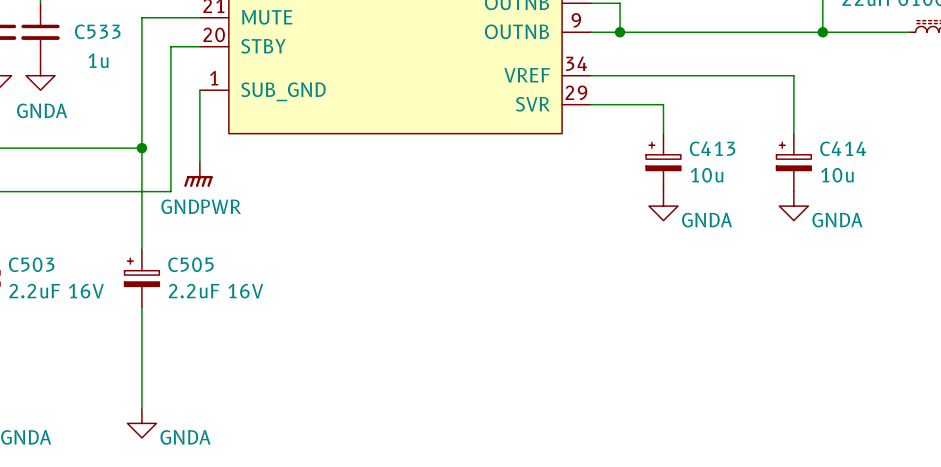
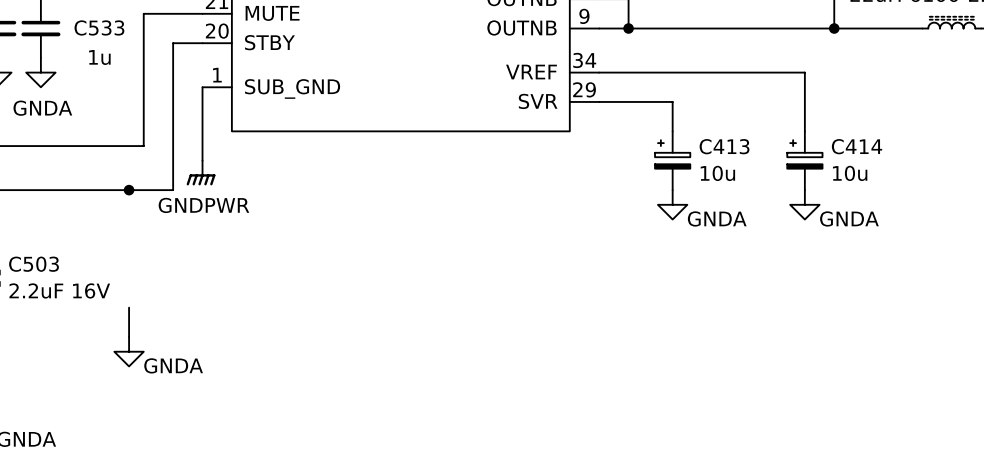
wire: (141, 148) (141, 249) -> none
junction position: (141, 148) -> (129, 190)
C505: 2.2uF 16V (141, 278) -> none
wire: none -> (129, 307) (129, 337)
wire: (141, 307) (141, 408) -> none
power symbol position: GNDA (141, 423) -> GNDA (129, 351)

